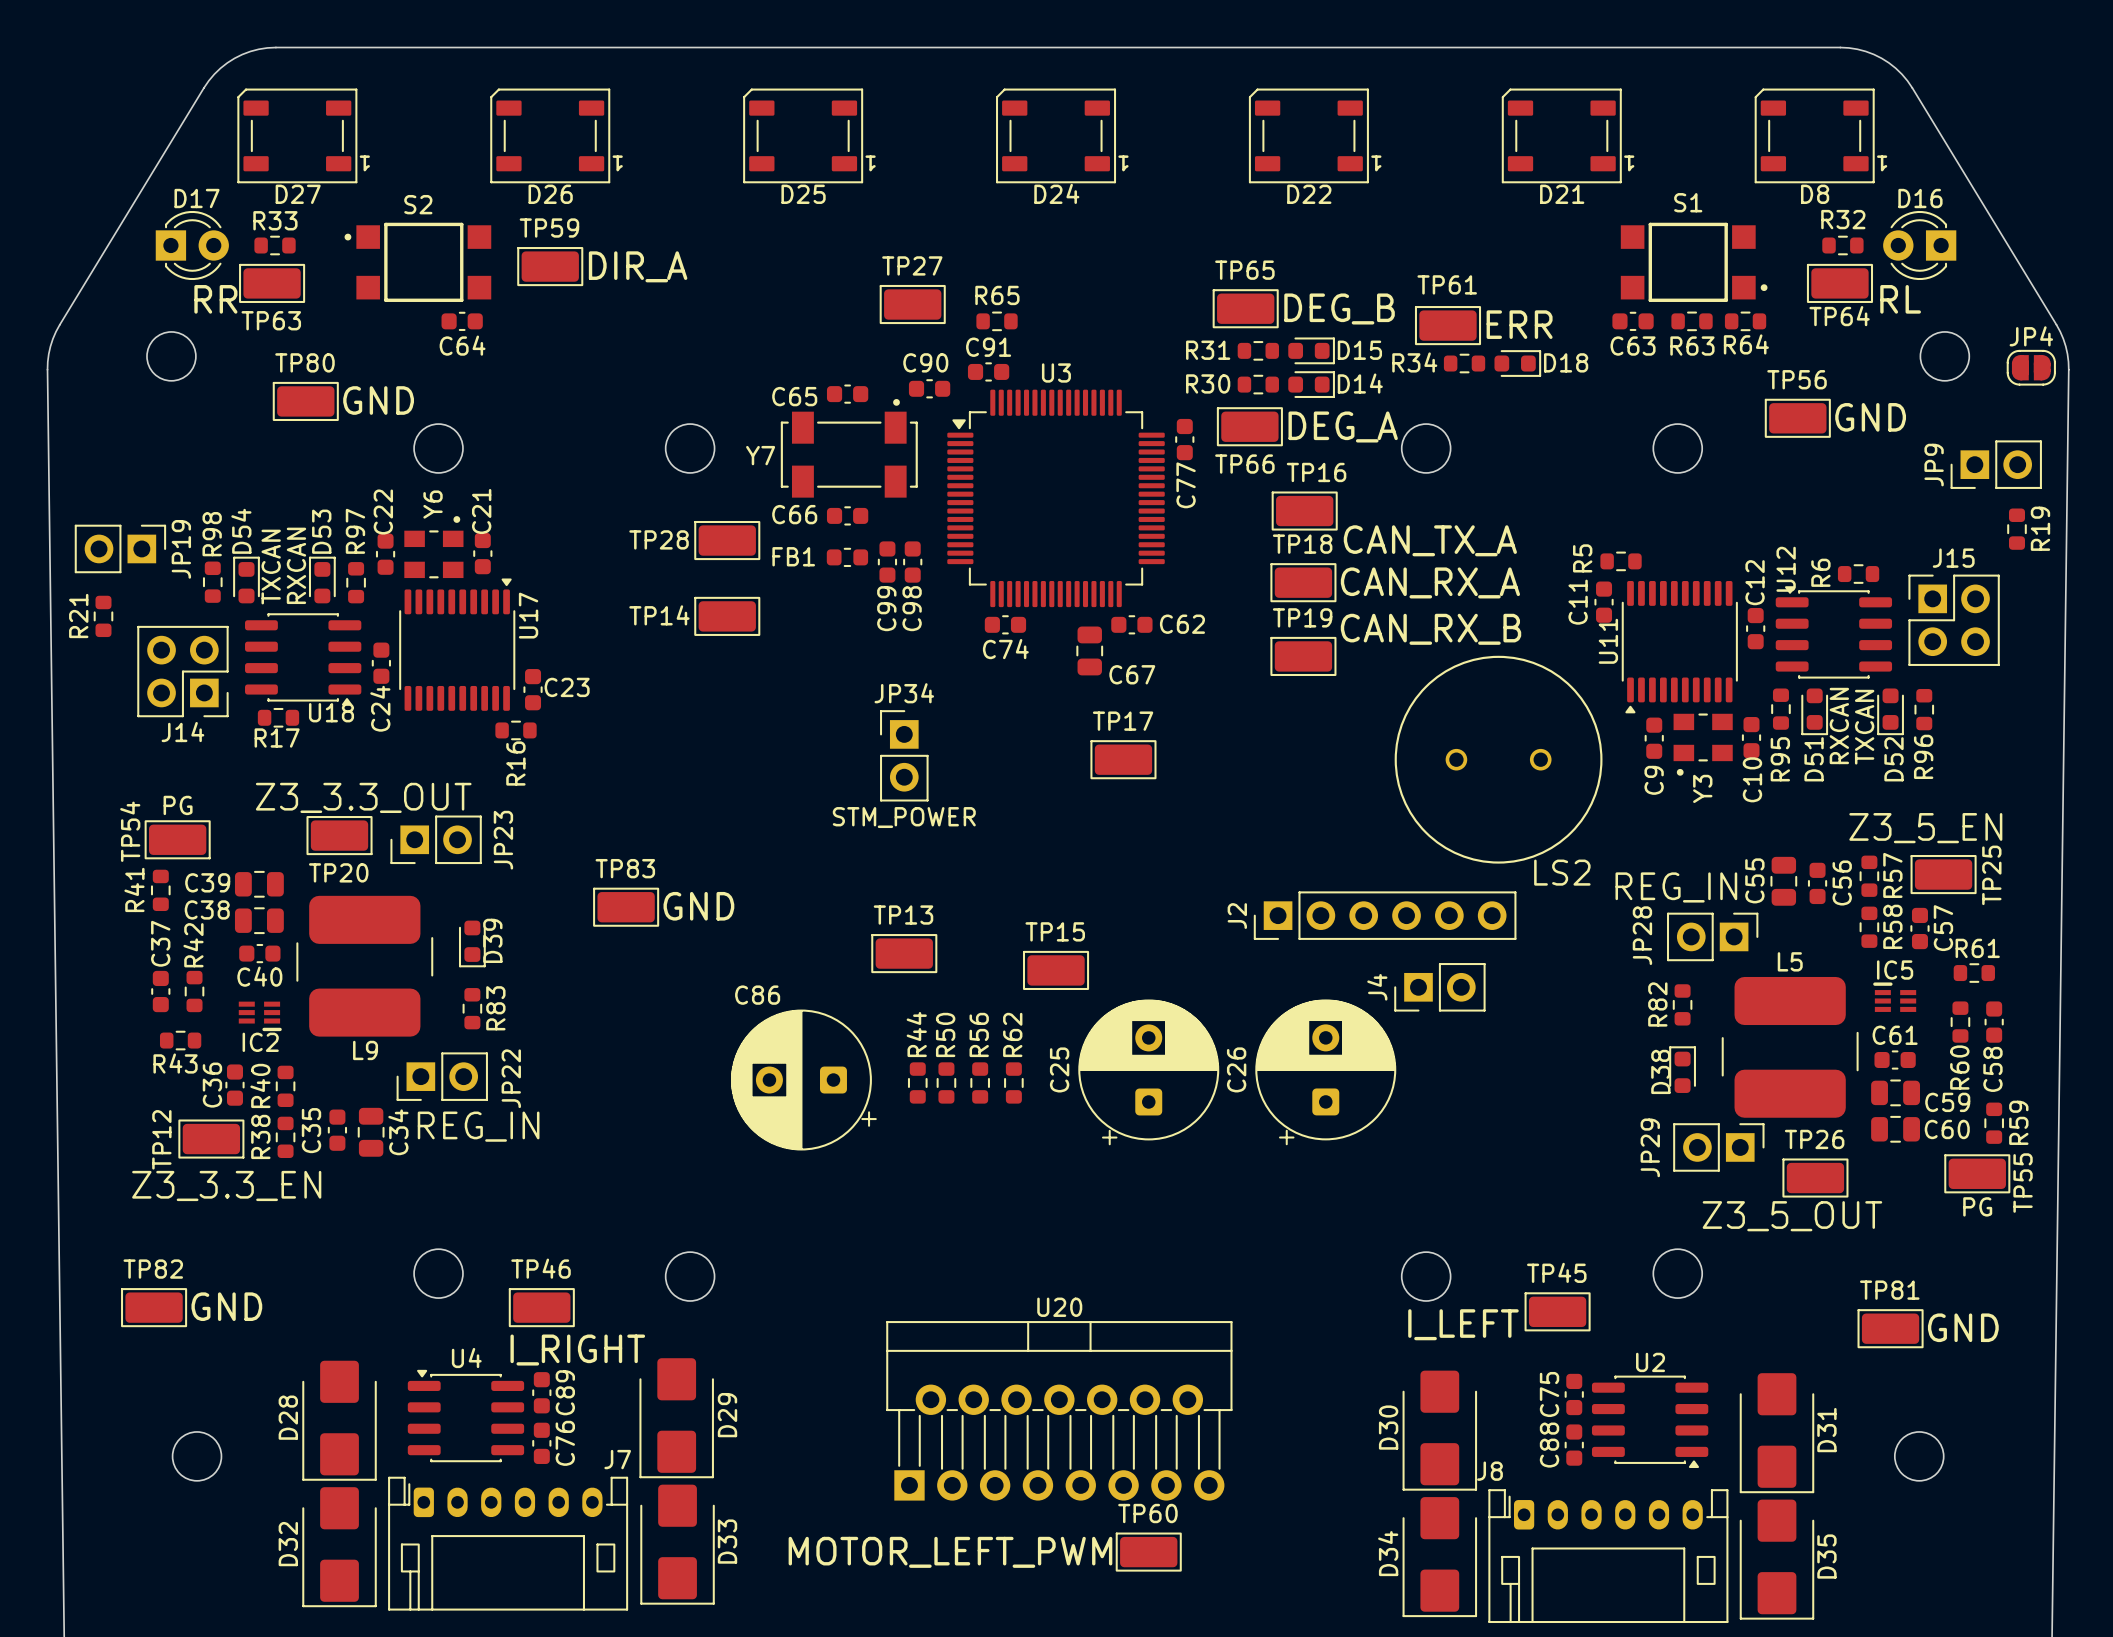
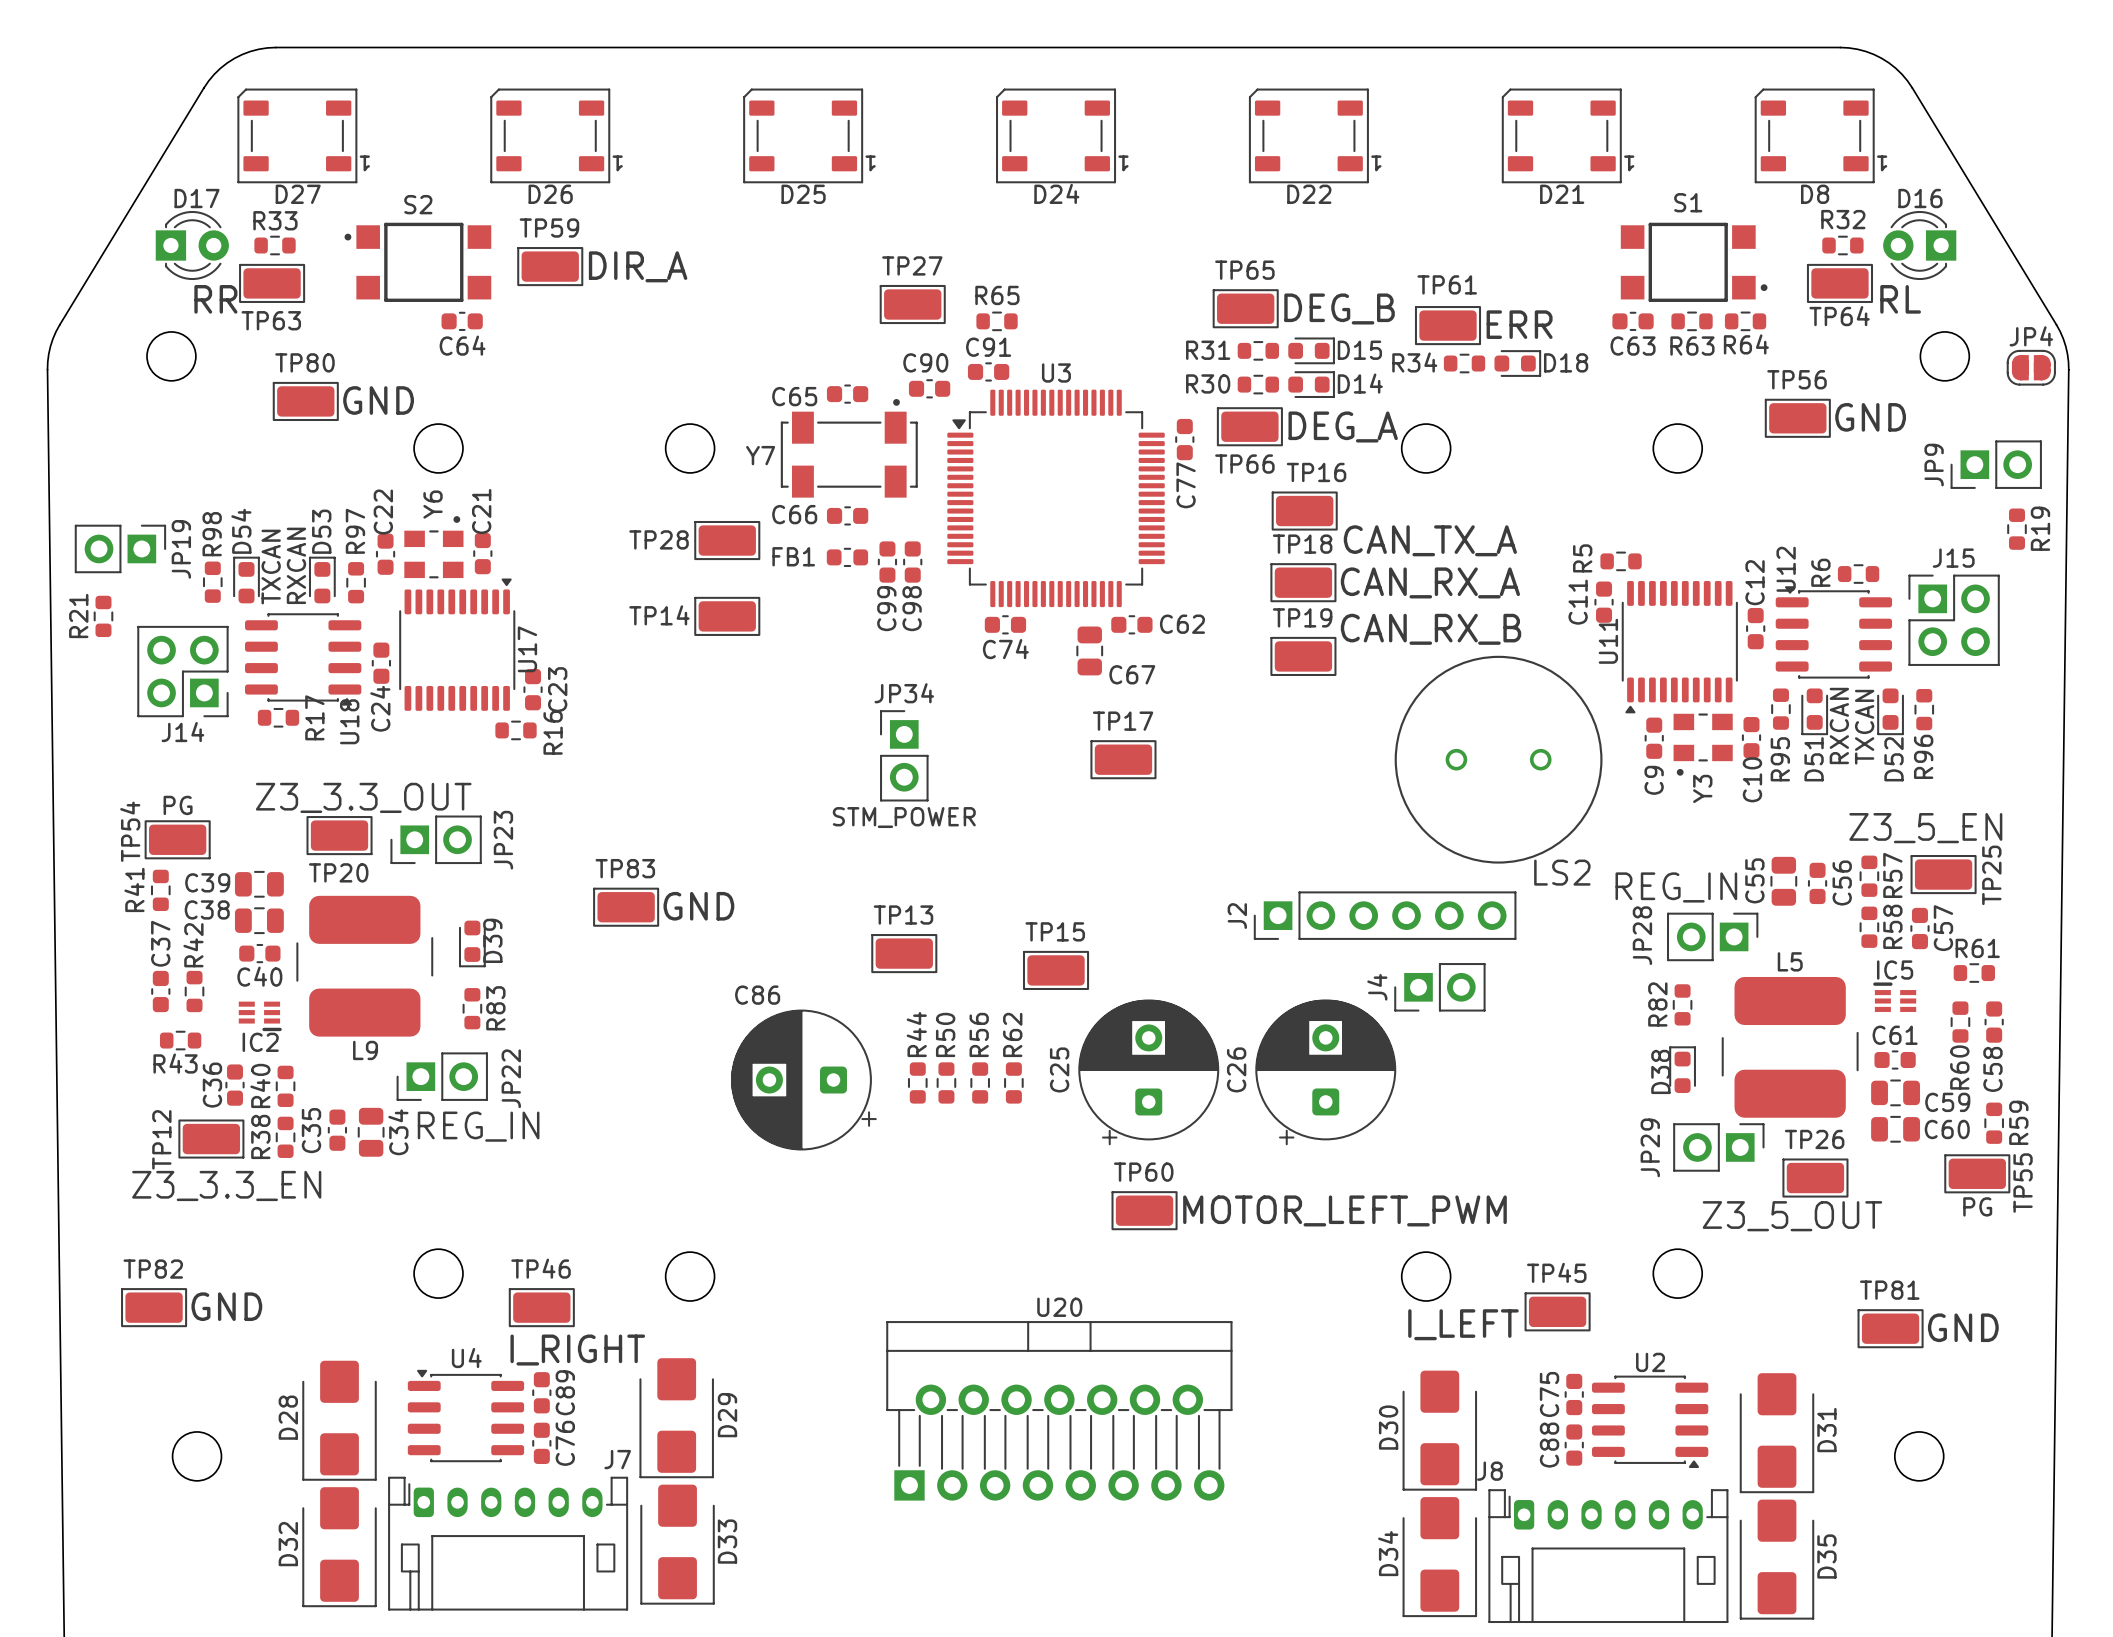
U17 name position: U17 (528, 615) -> U17 (527, 649)
C23 name rotation: 0° (567, 687) -> 90° counterclockwise (557, 689)
U18 name rotation: 0° (331, 712) -> 90° counterclockwise (349, 721)
R17 name rotation: 0° (277, 738) -> 90° counterclockwise (314, 717)
R16 name position: R16 (515, 763) -> R16 (553, 732)
TP60 value position: MOTOR_LEFT_PWM (950, 1552) -> MOTOR_LEFT_PWM (1344, 1210)
TP60 position: (1148, 1552) -> (1144, 1210)

